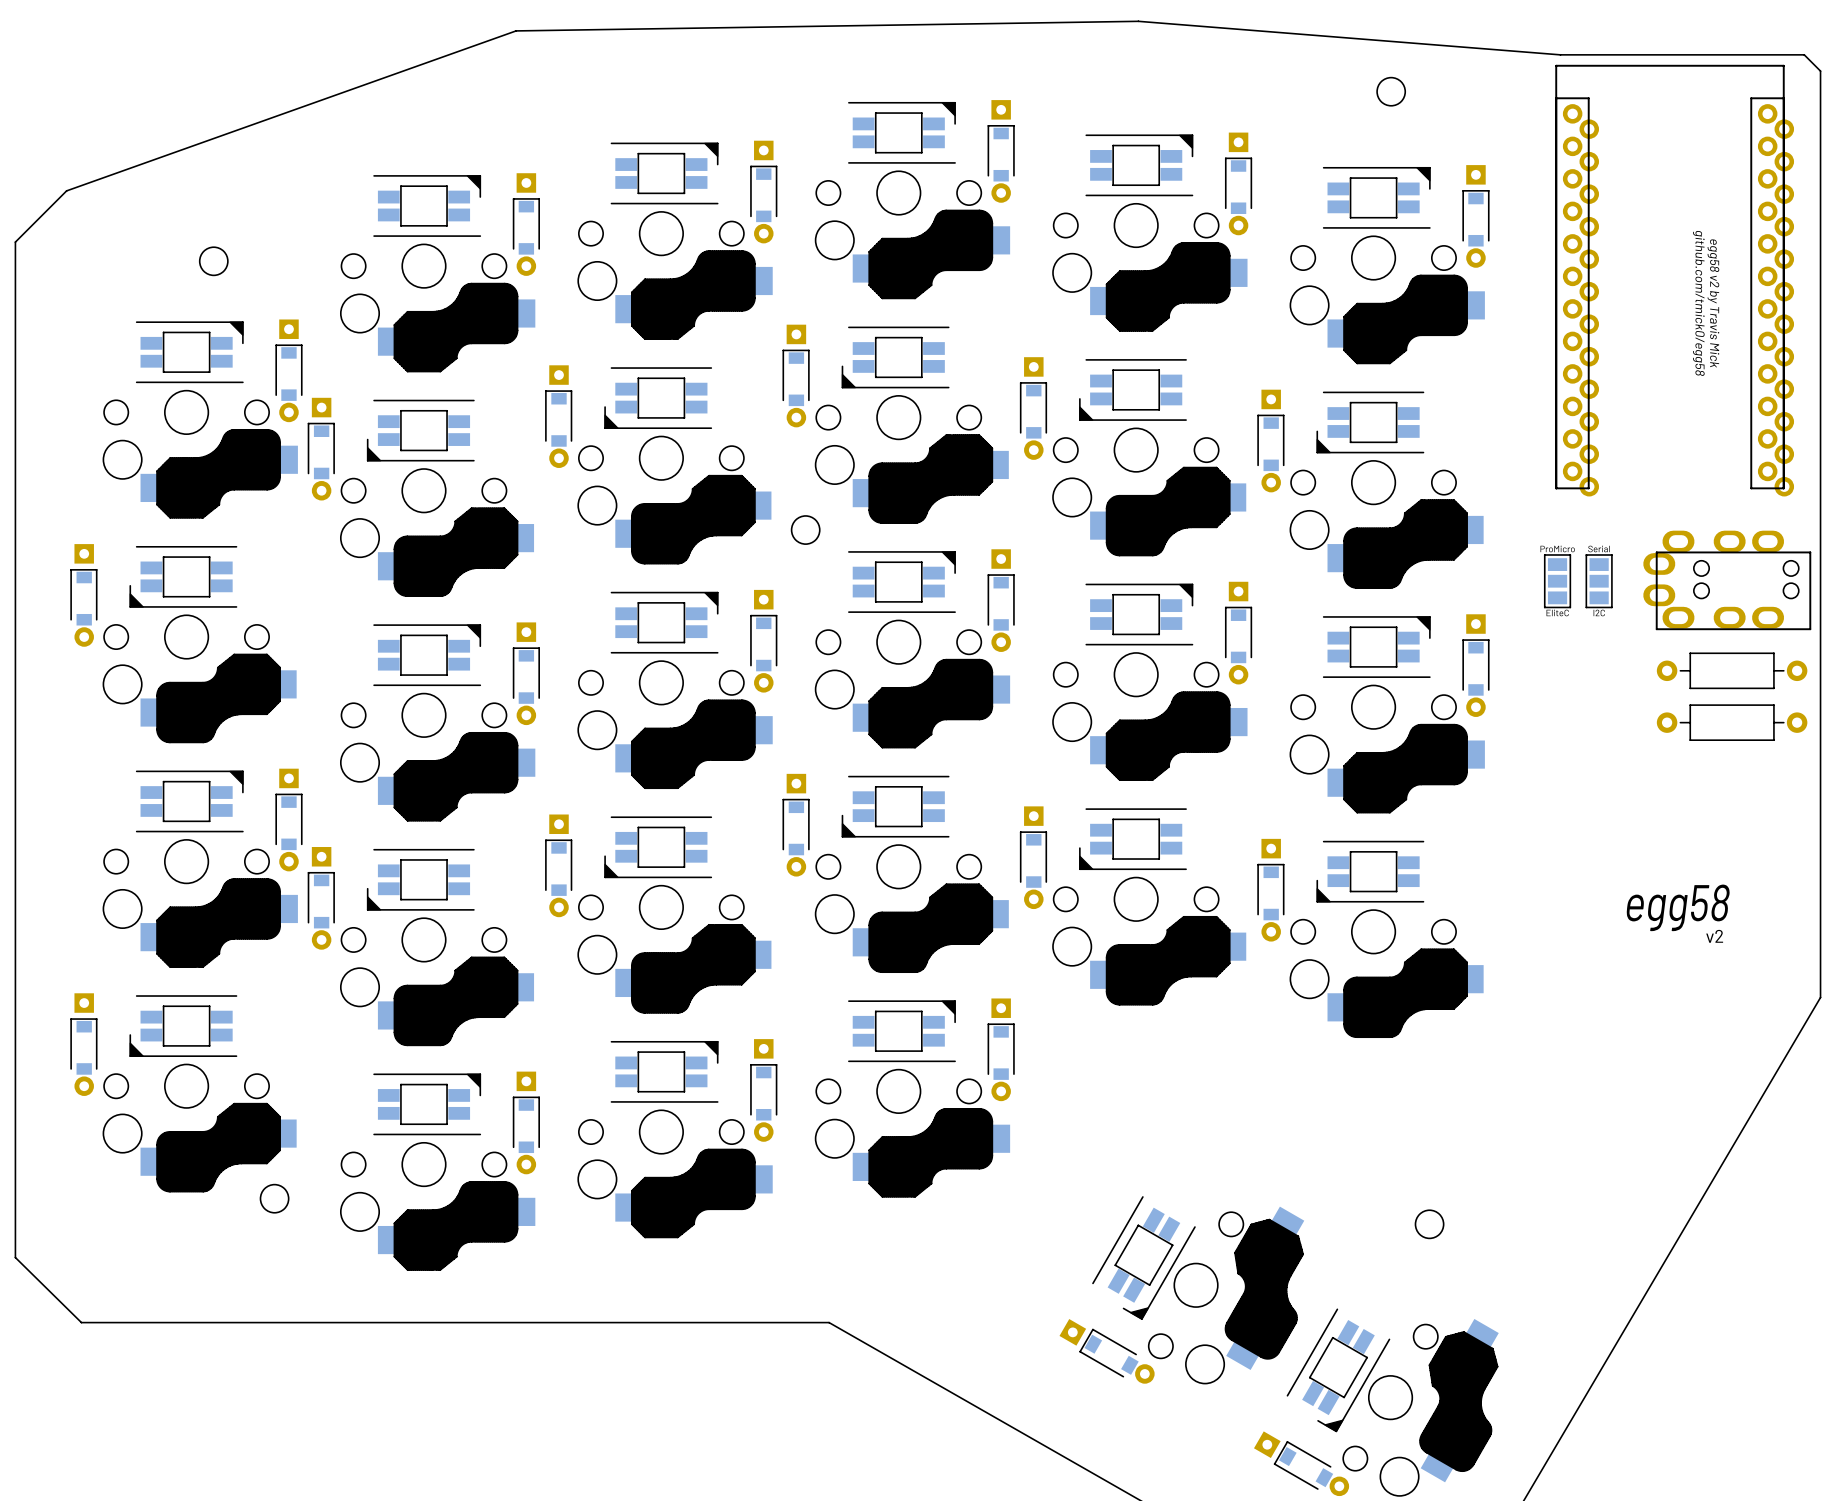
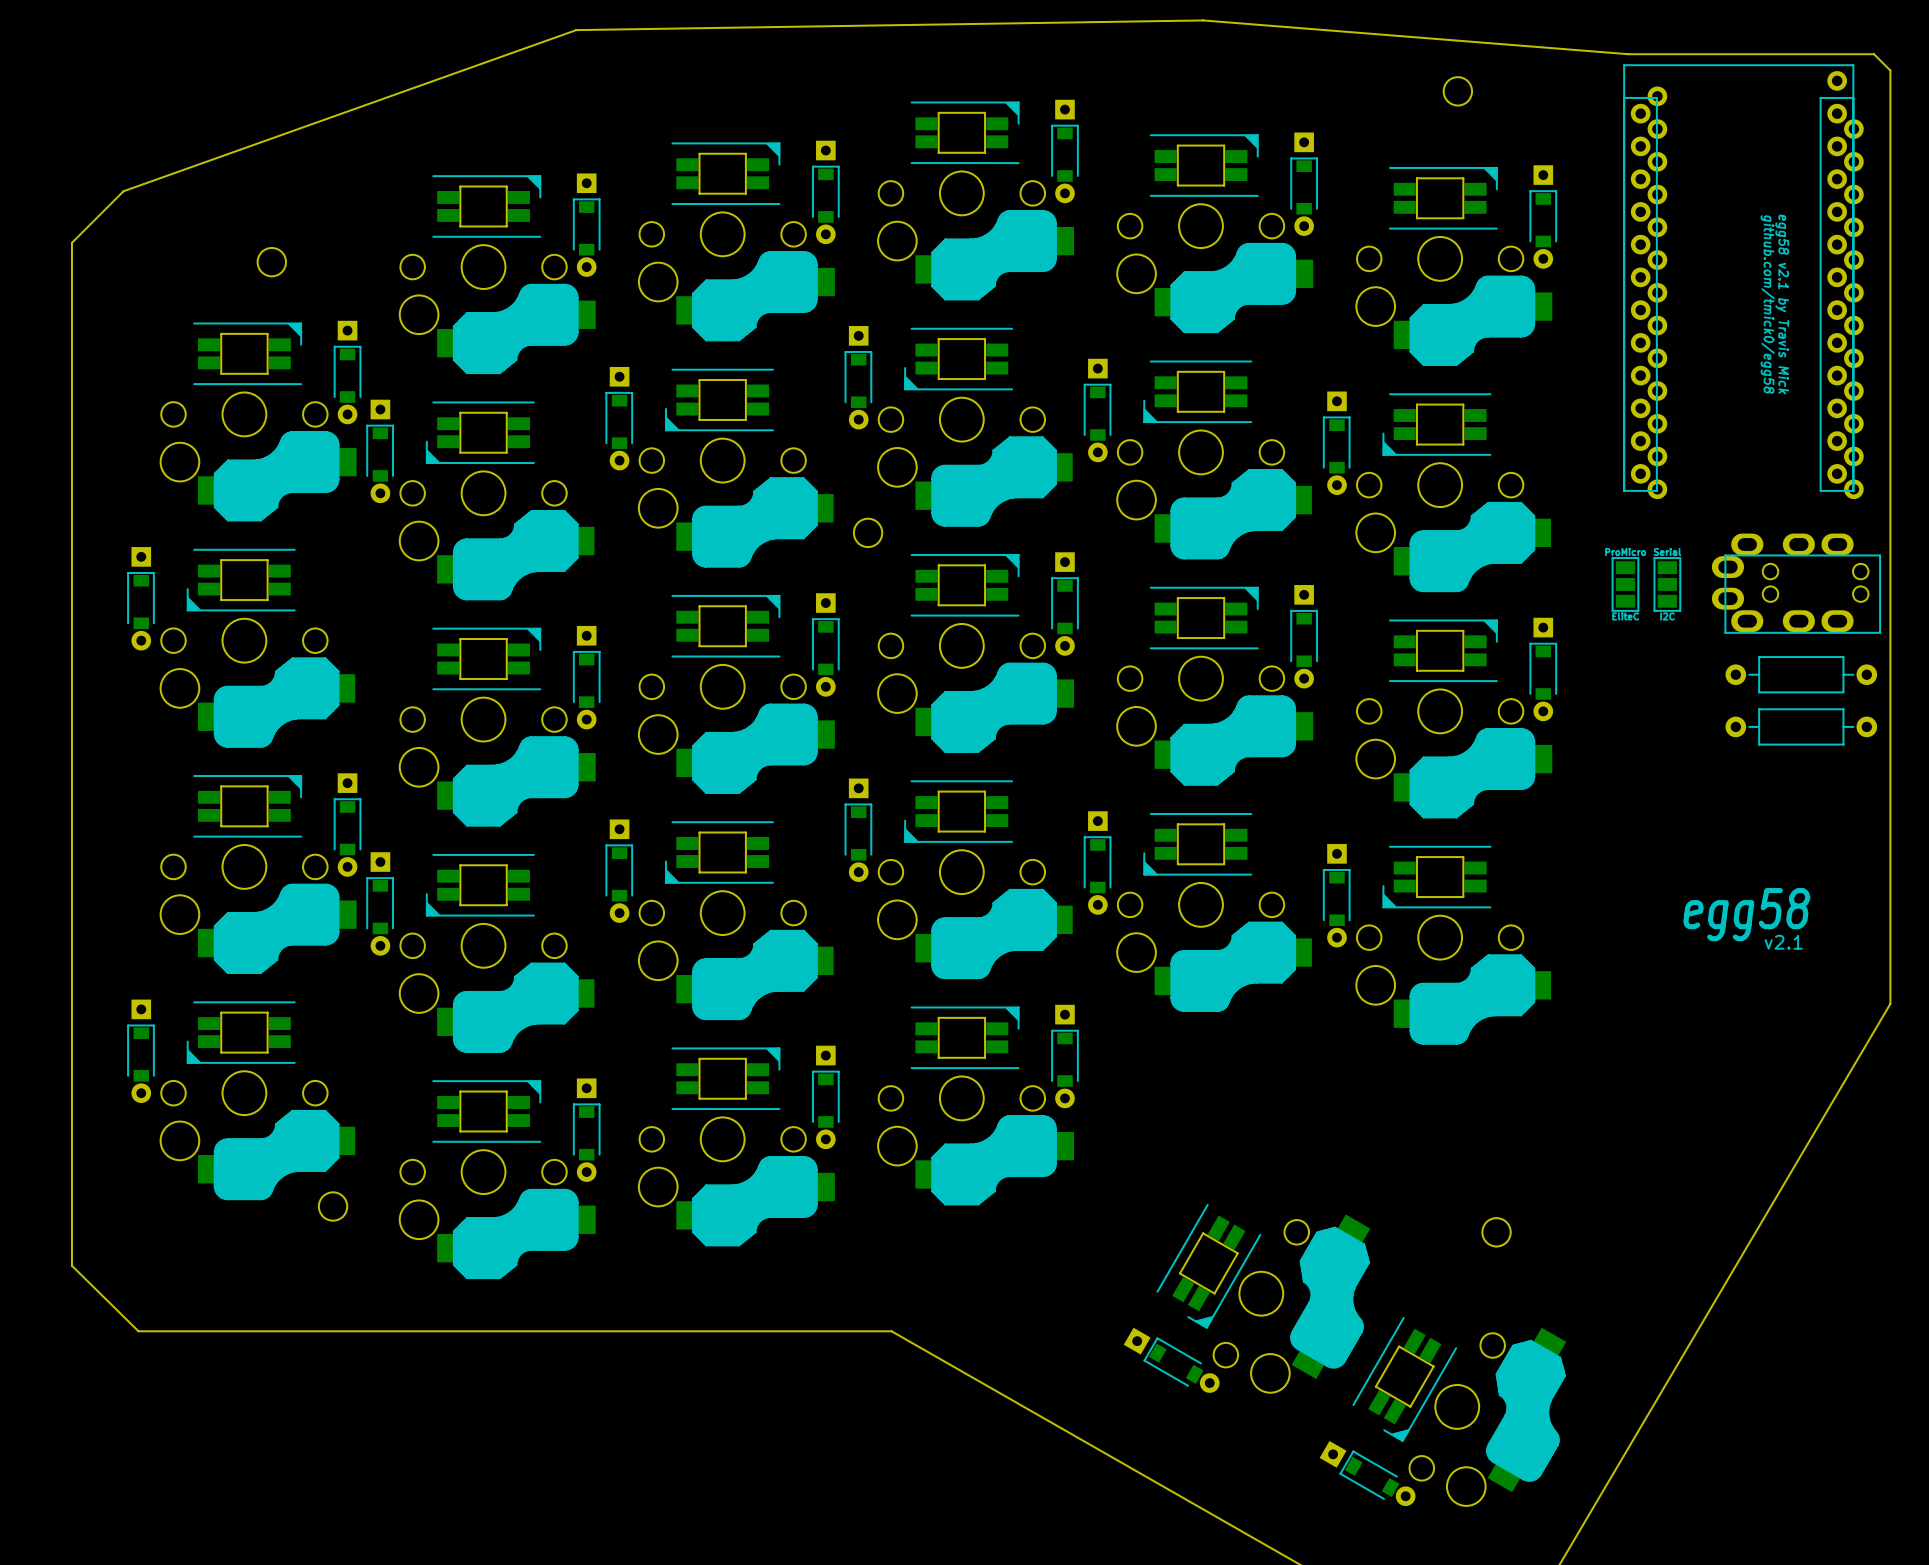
part footprint: [1555, 64, 1795, 497] -> [1623, 64, 1864, 500]
drawing shape: [1692, 230, 1720, 376] -> [1760, 214, 1790, 395]
drawing shape: [1626, 884, 1730, 943] -> [1683, 888, 1811, 950]

